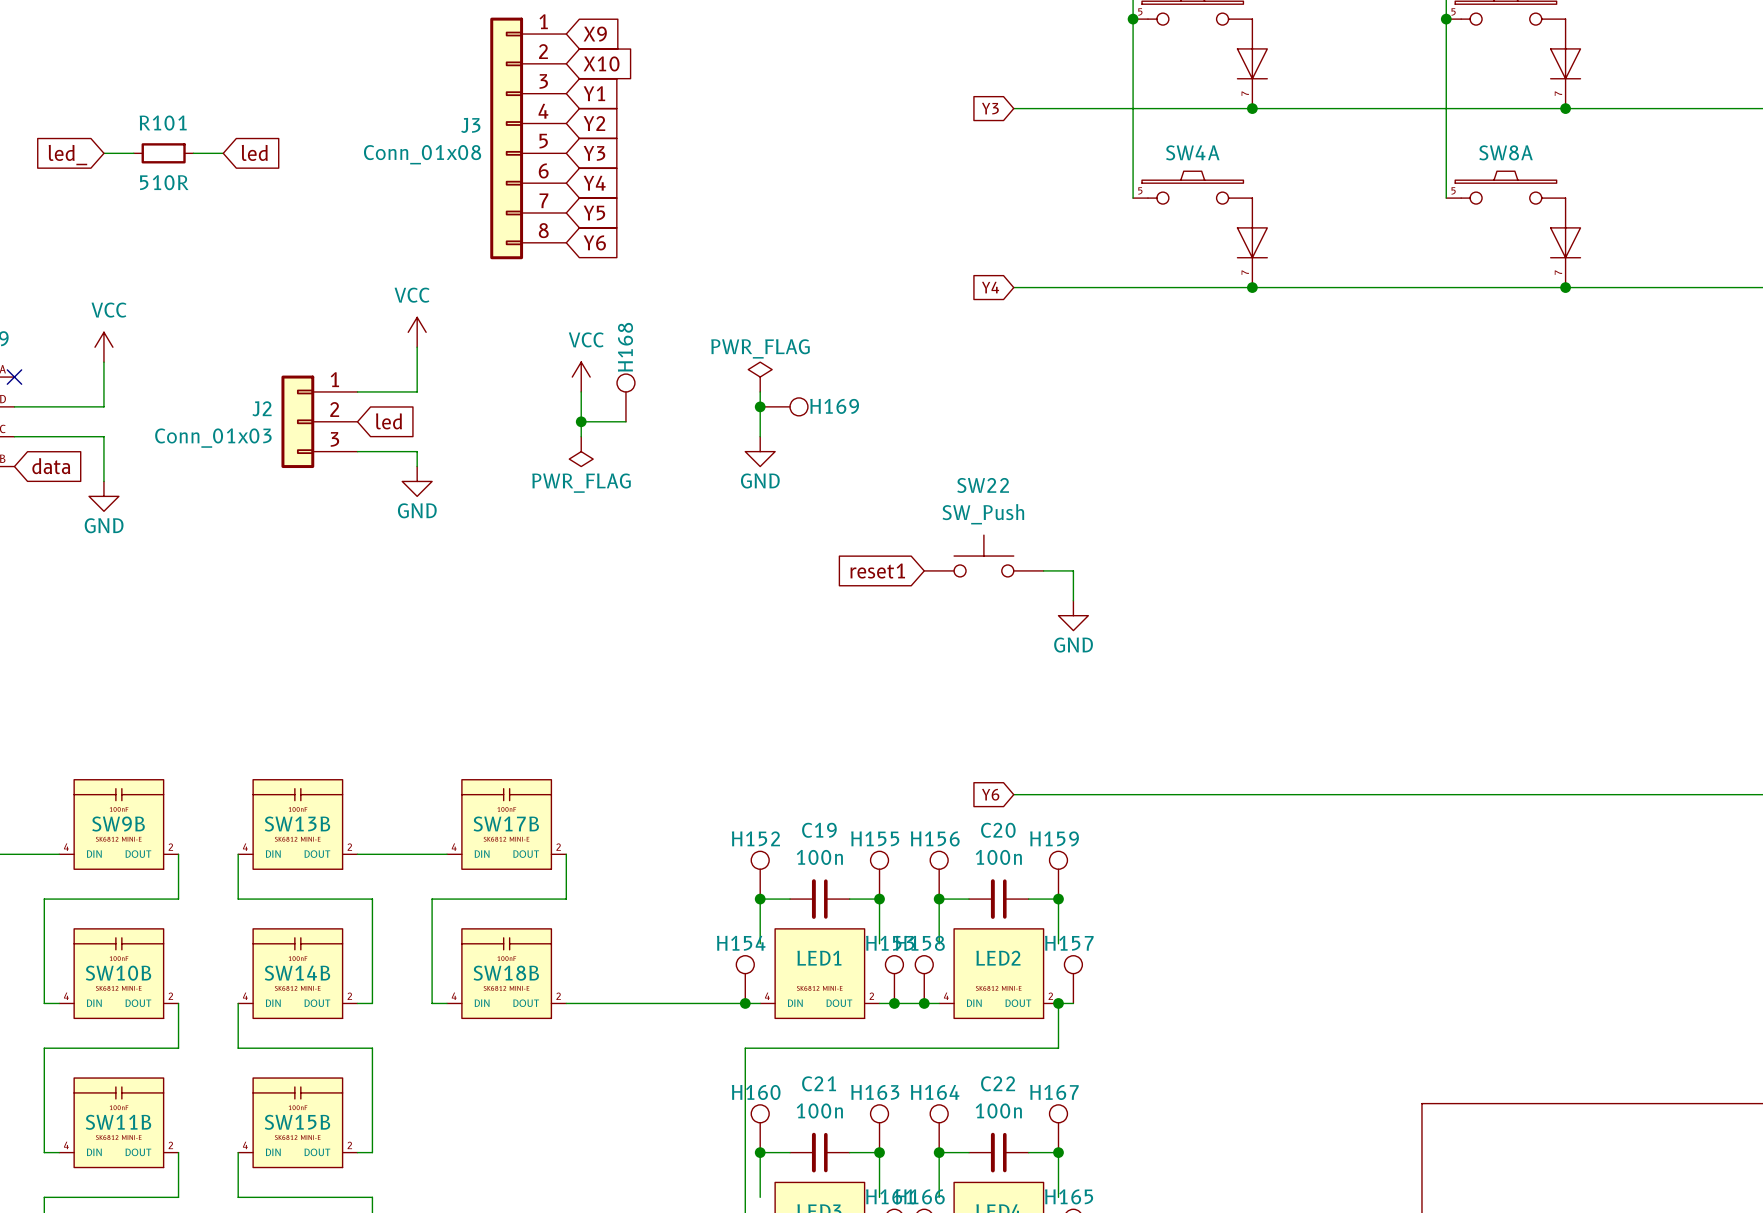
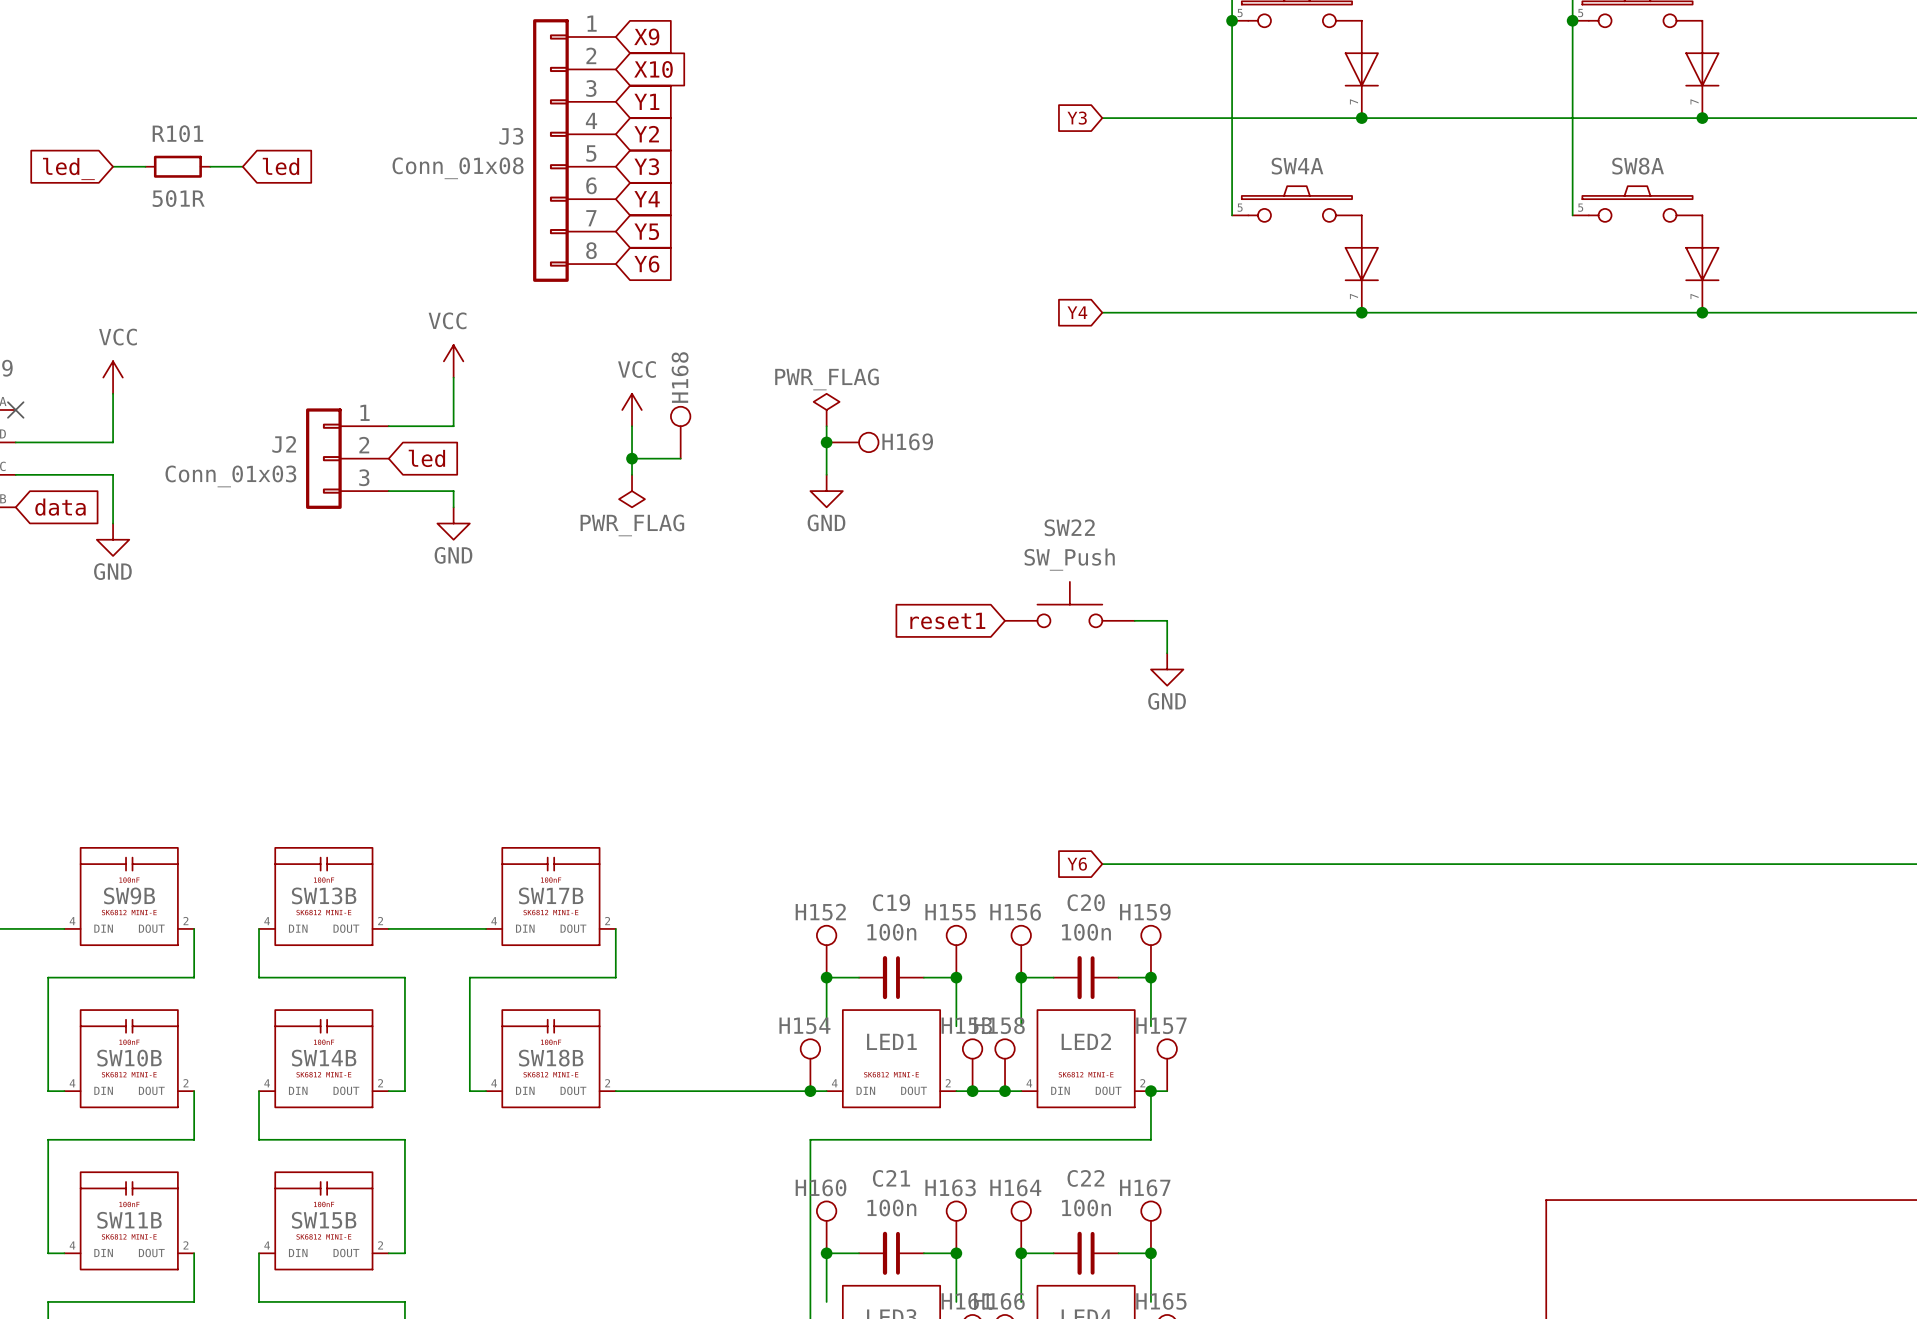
R101 value: 510R (164, 182) -> 501R (178, 198)

